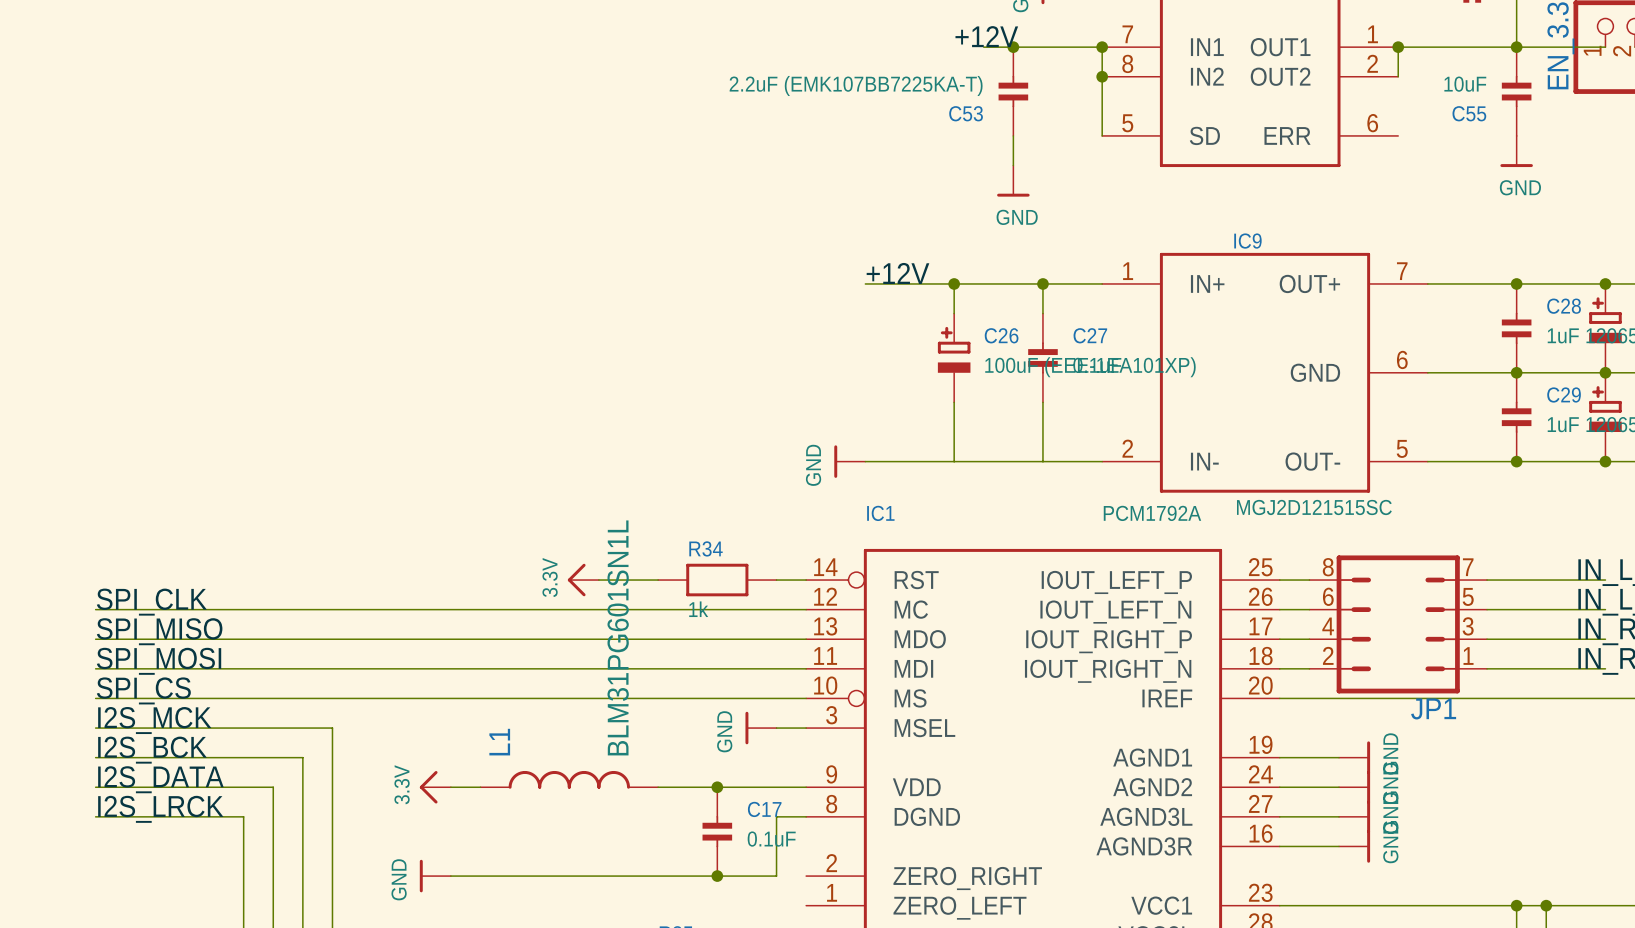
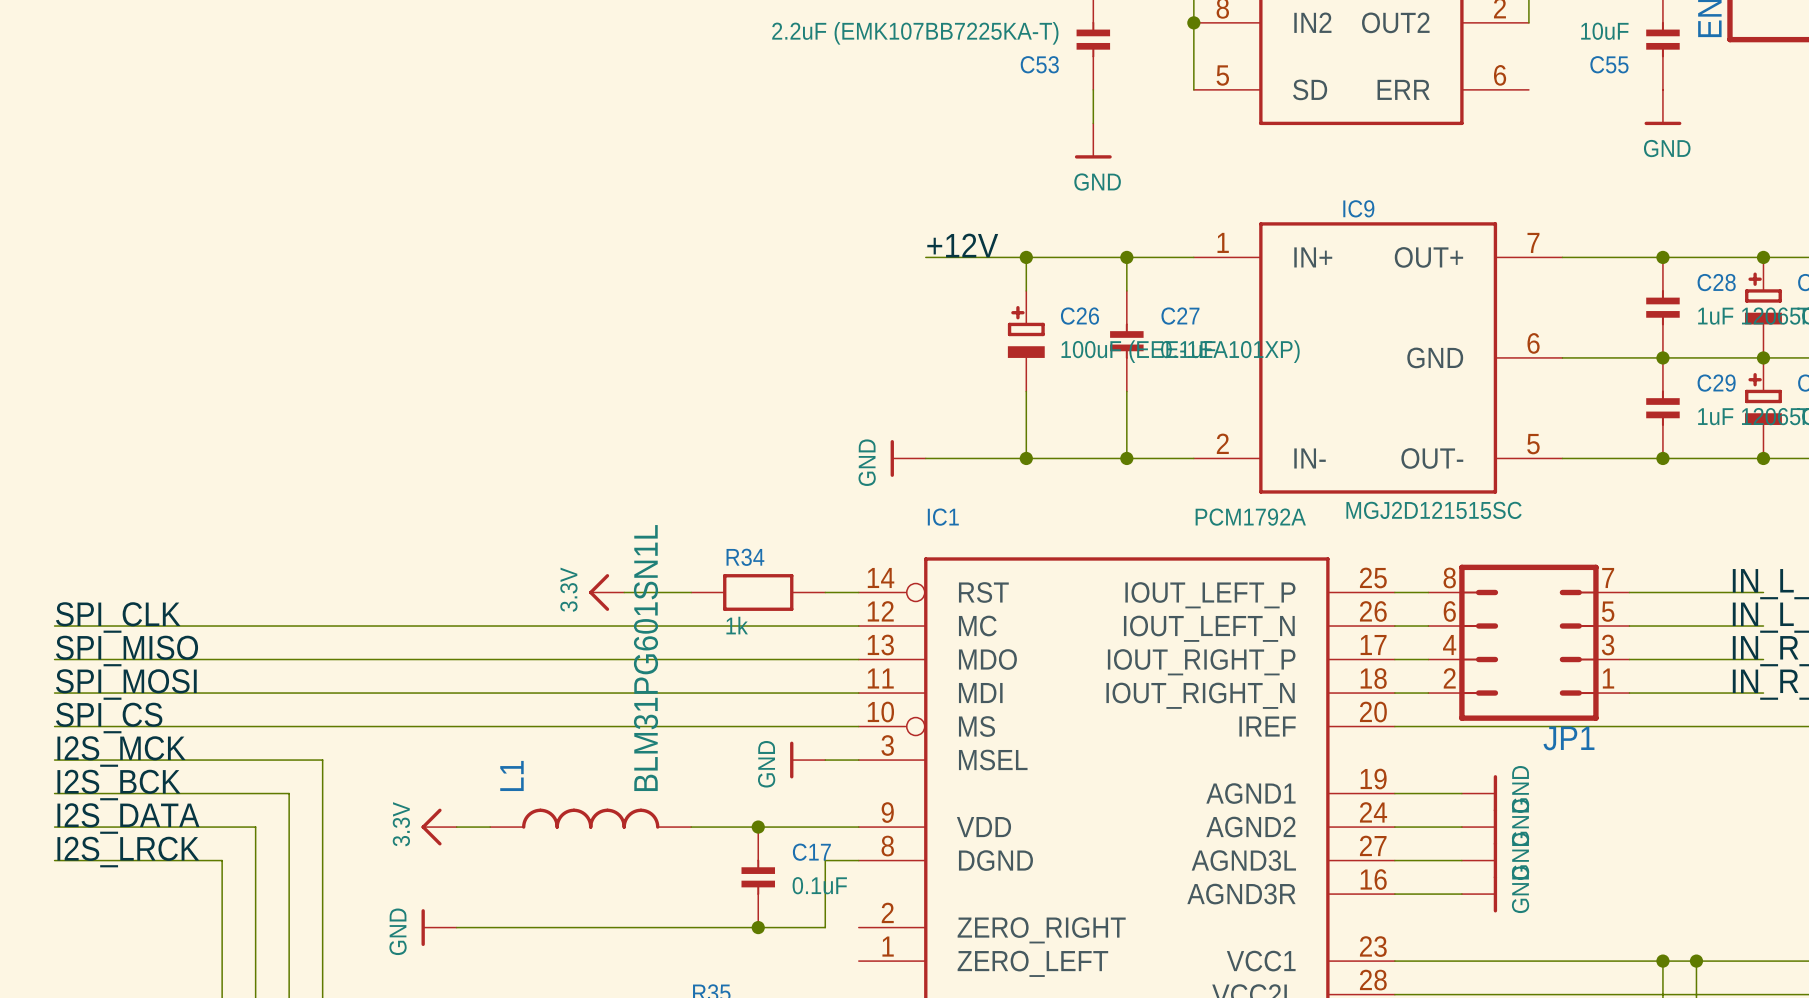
junction: none -> (1026, 458)
junction: none -> (1126, 458)

